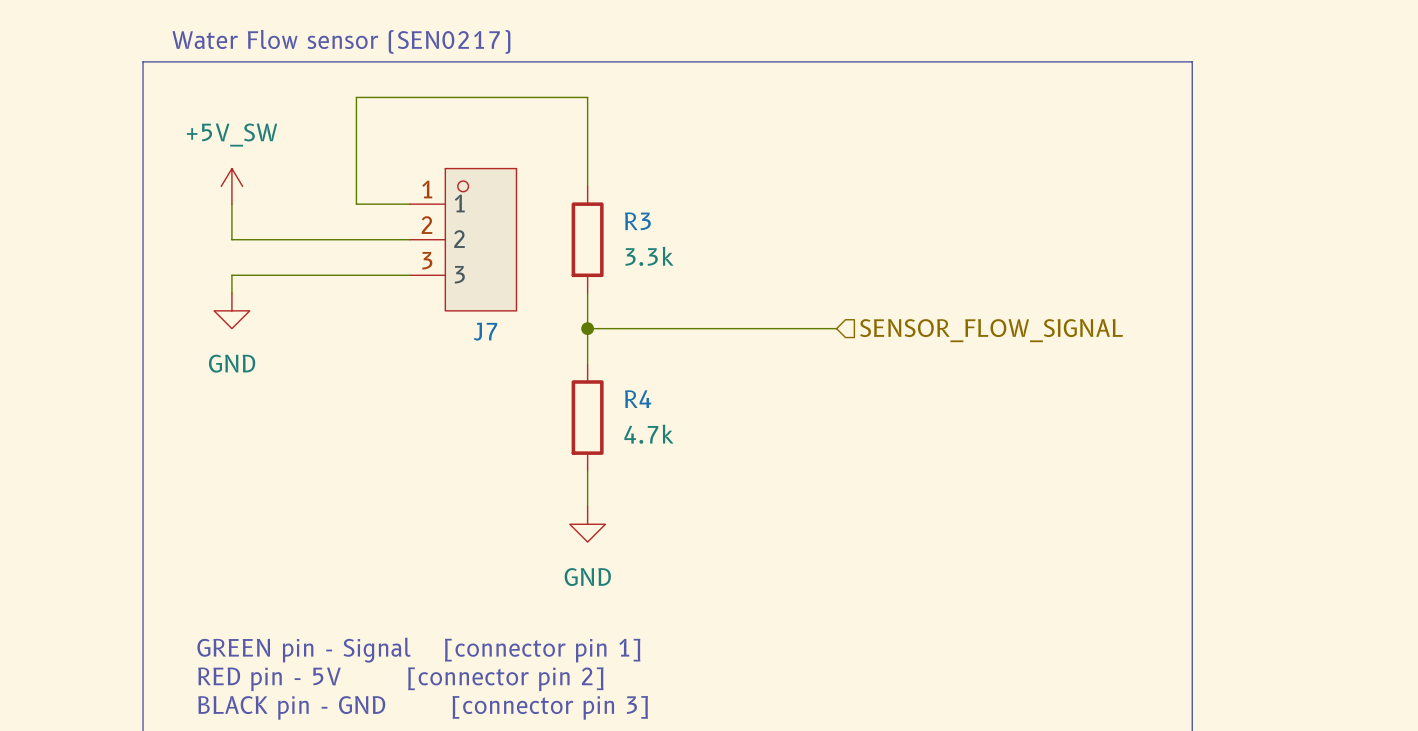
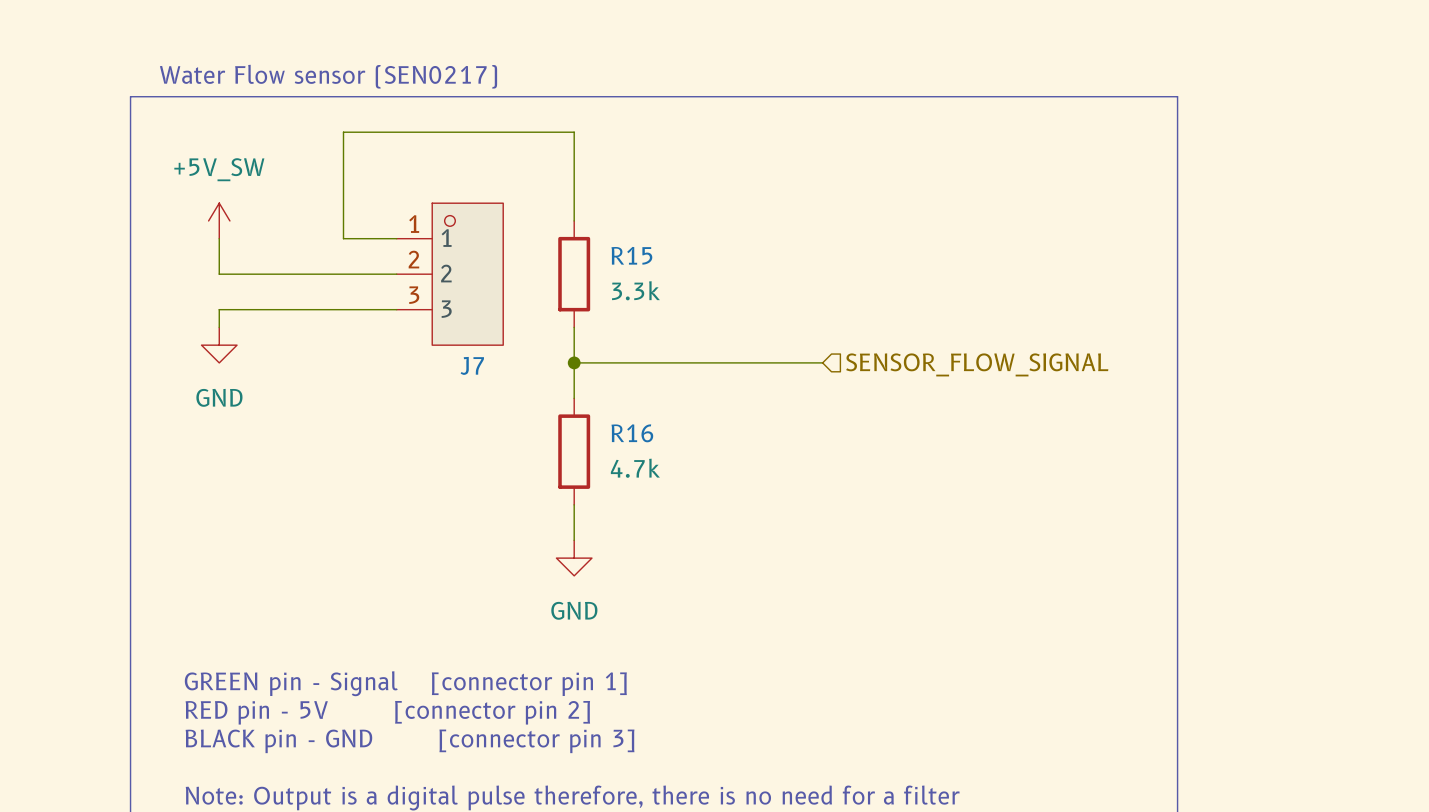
R3 name: R3 (637, 221) -> R15 (631, 255)
R4 name: R4 (638, 399) -> R16 (632, 433)

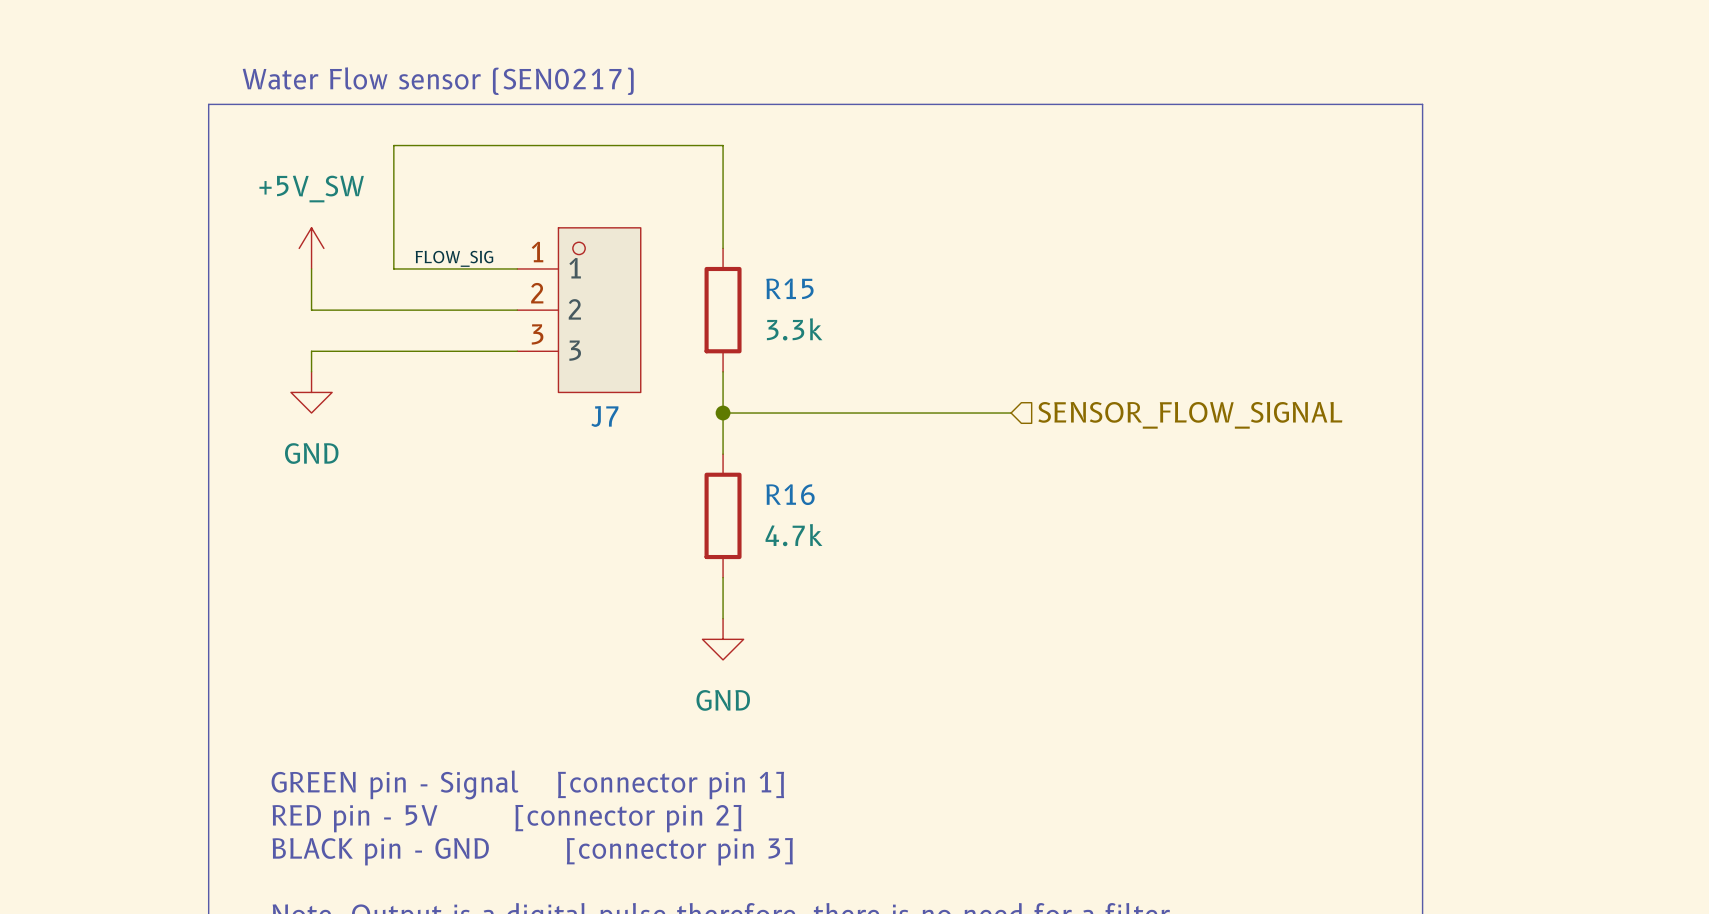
wire: (343, 132) (343, 238) -> (455, 145) (393, 145) (393, 268) (455, 268)
label: none -> FLOW_SIG (454, 258)

